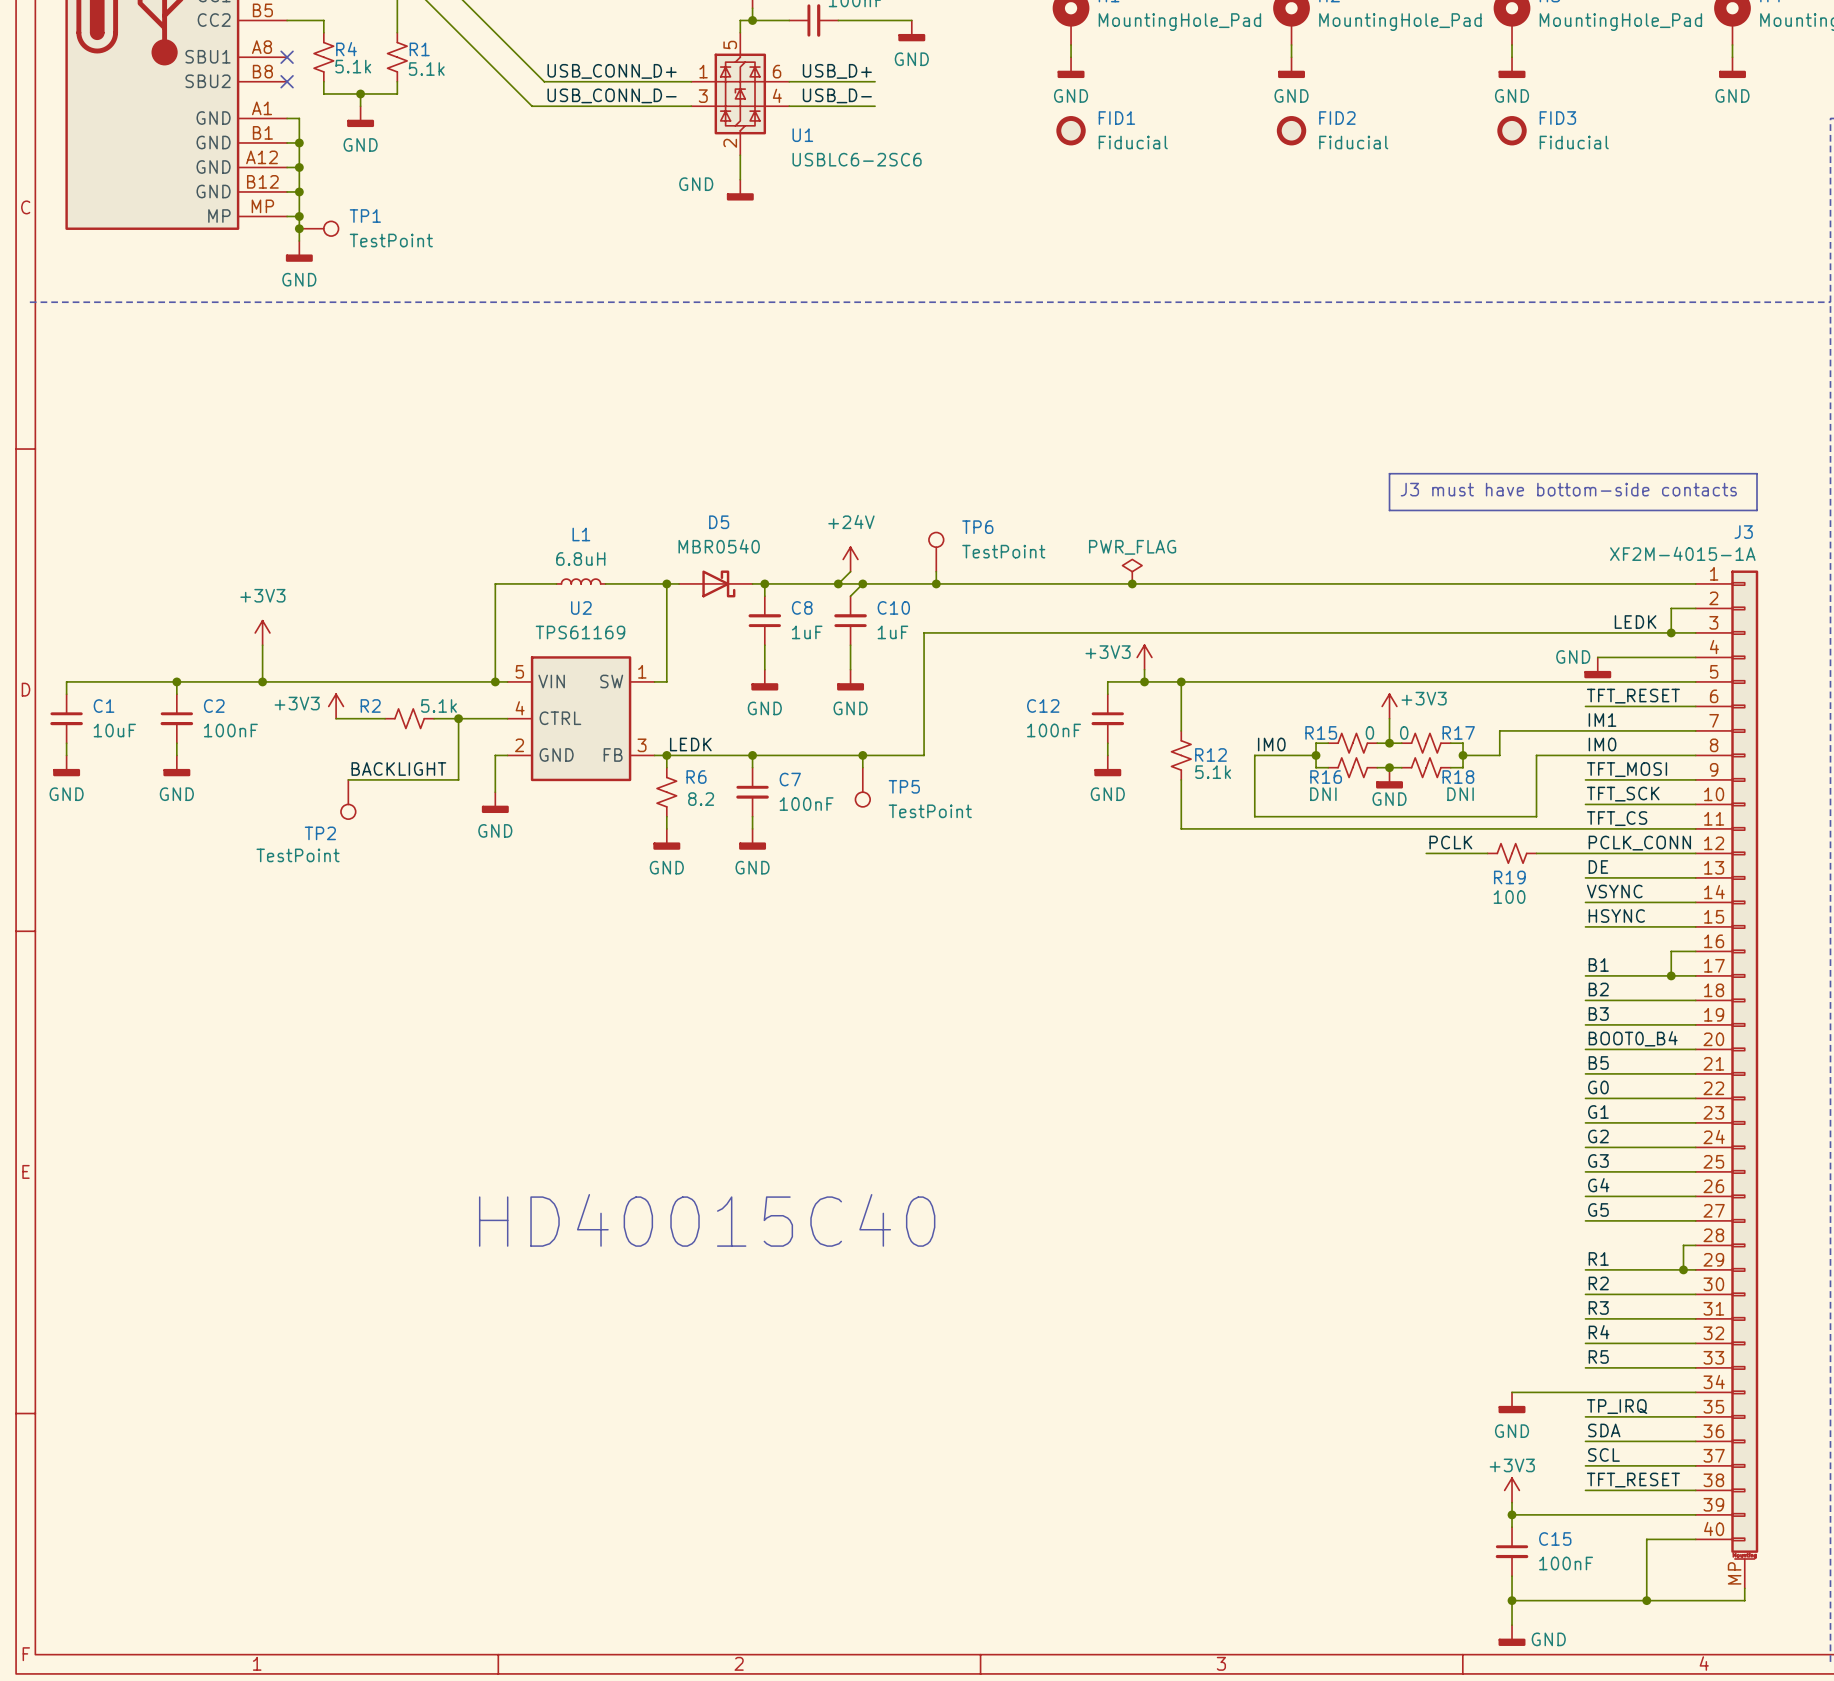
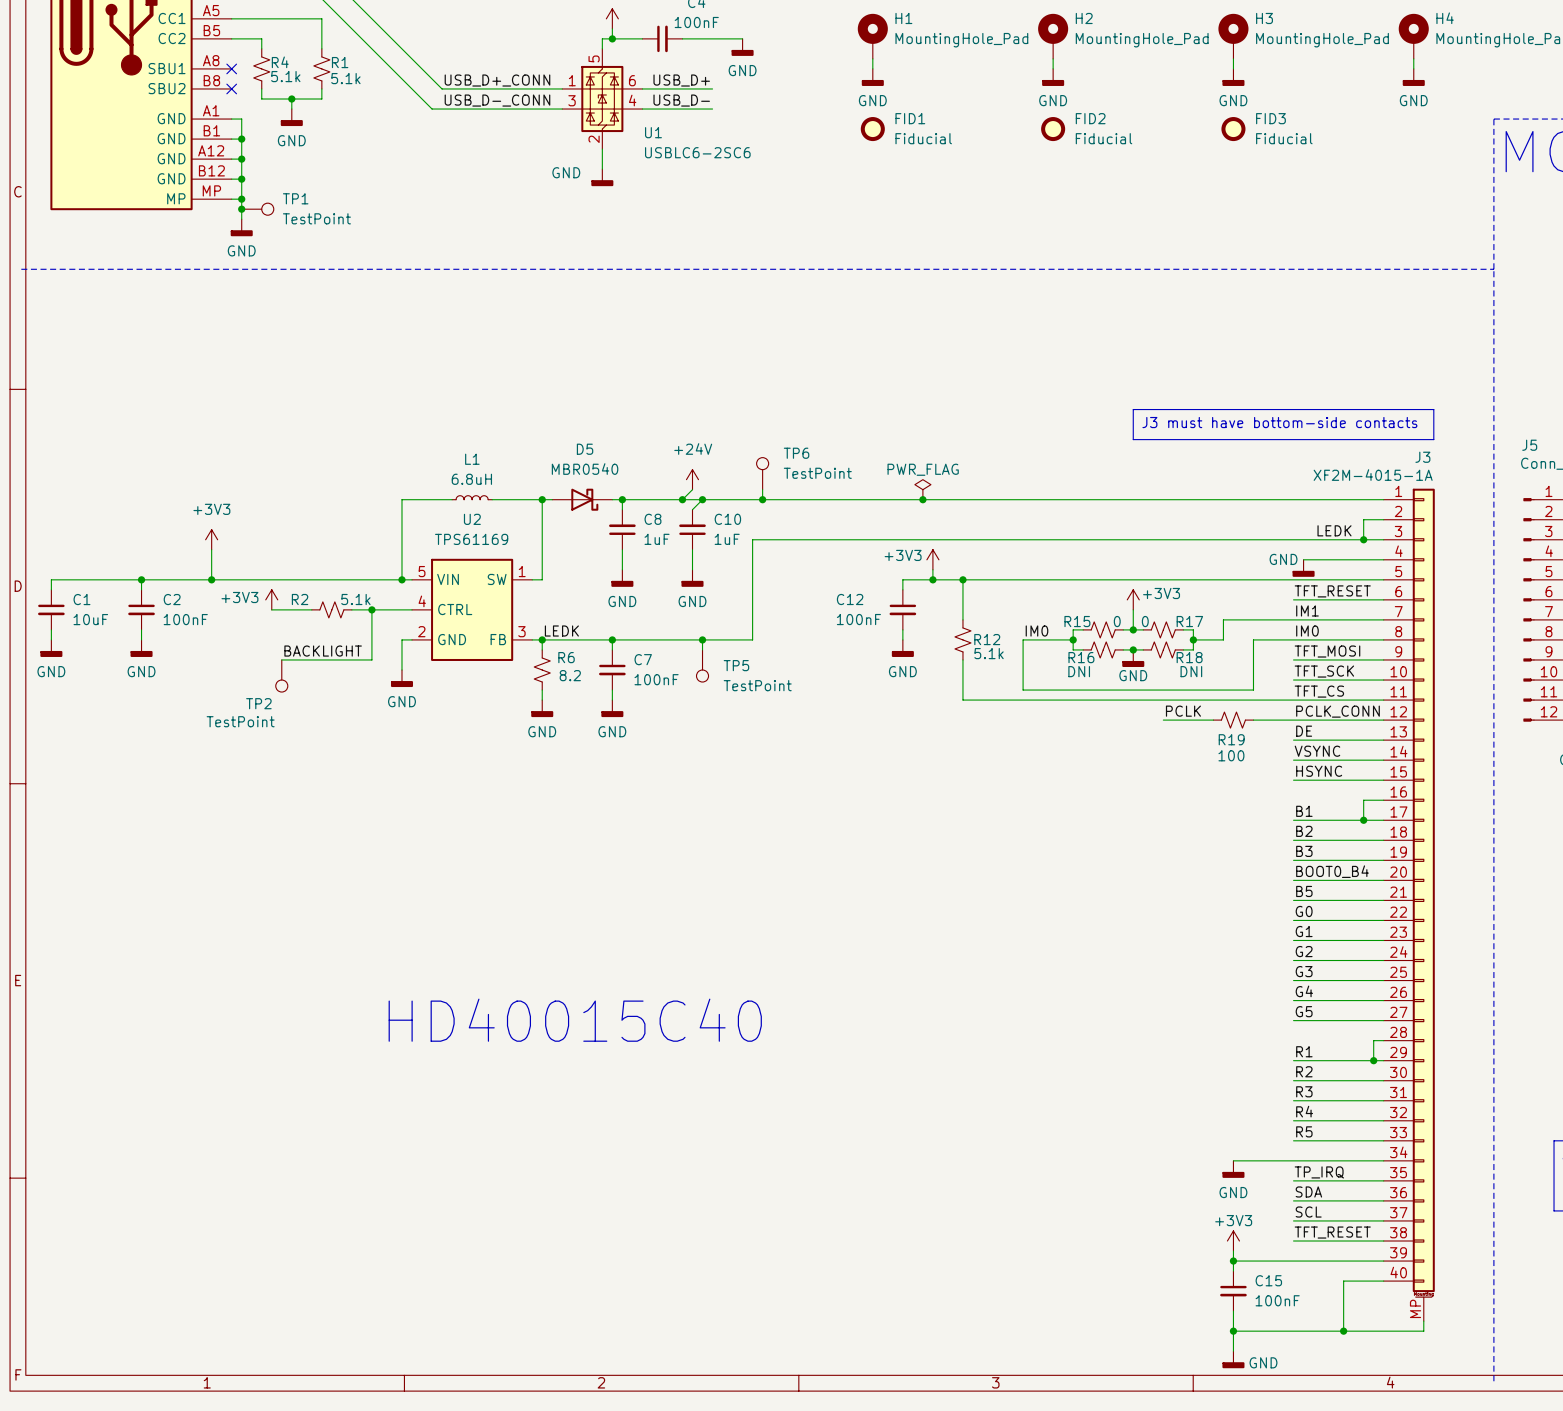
label: USB_CONN_D+ (612, 71) -> USB_D+_CONN (497, 80)
label: USB_CONN_D- (612, 95) -> USB_D-_CONN (497, 100)

